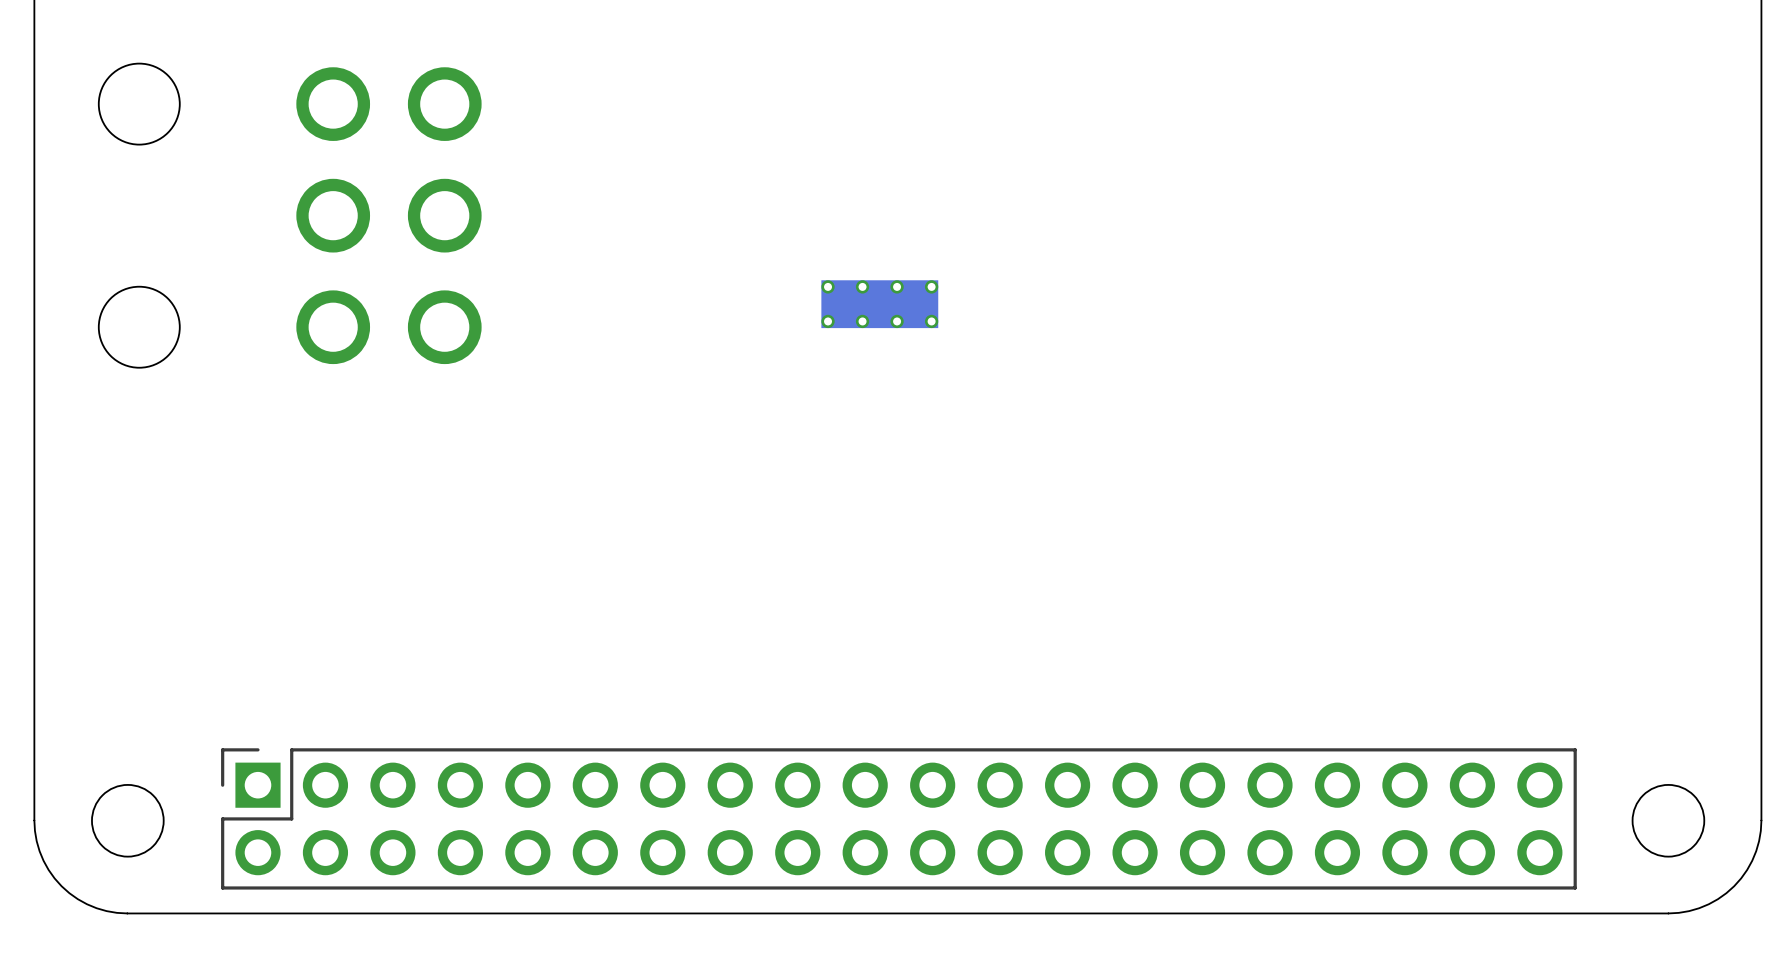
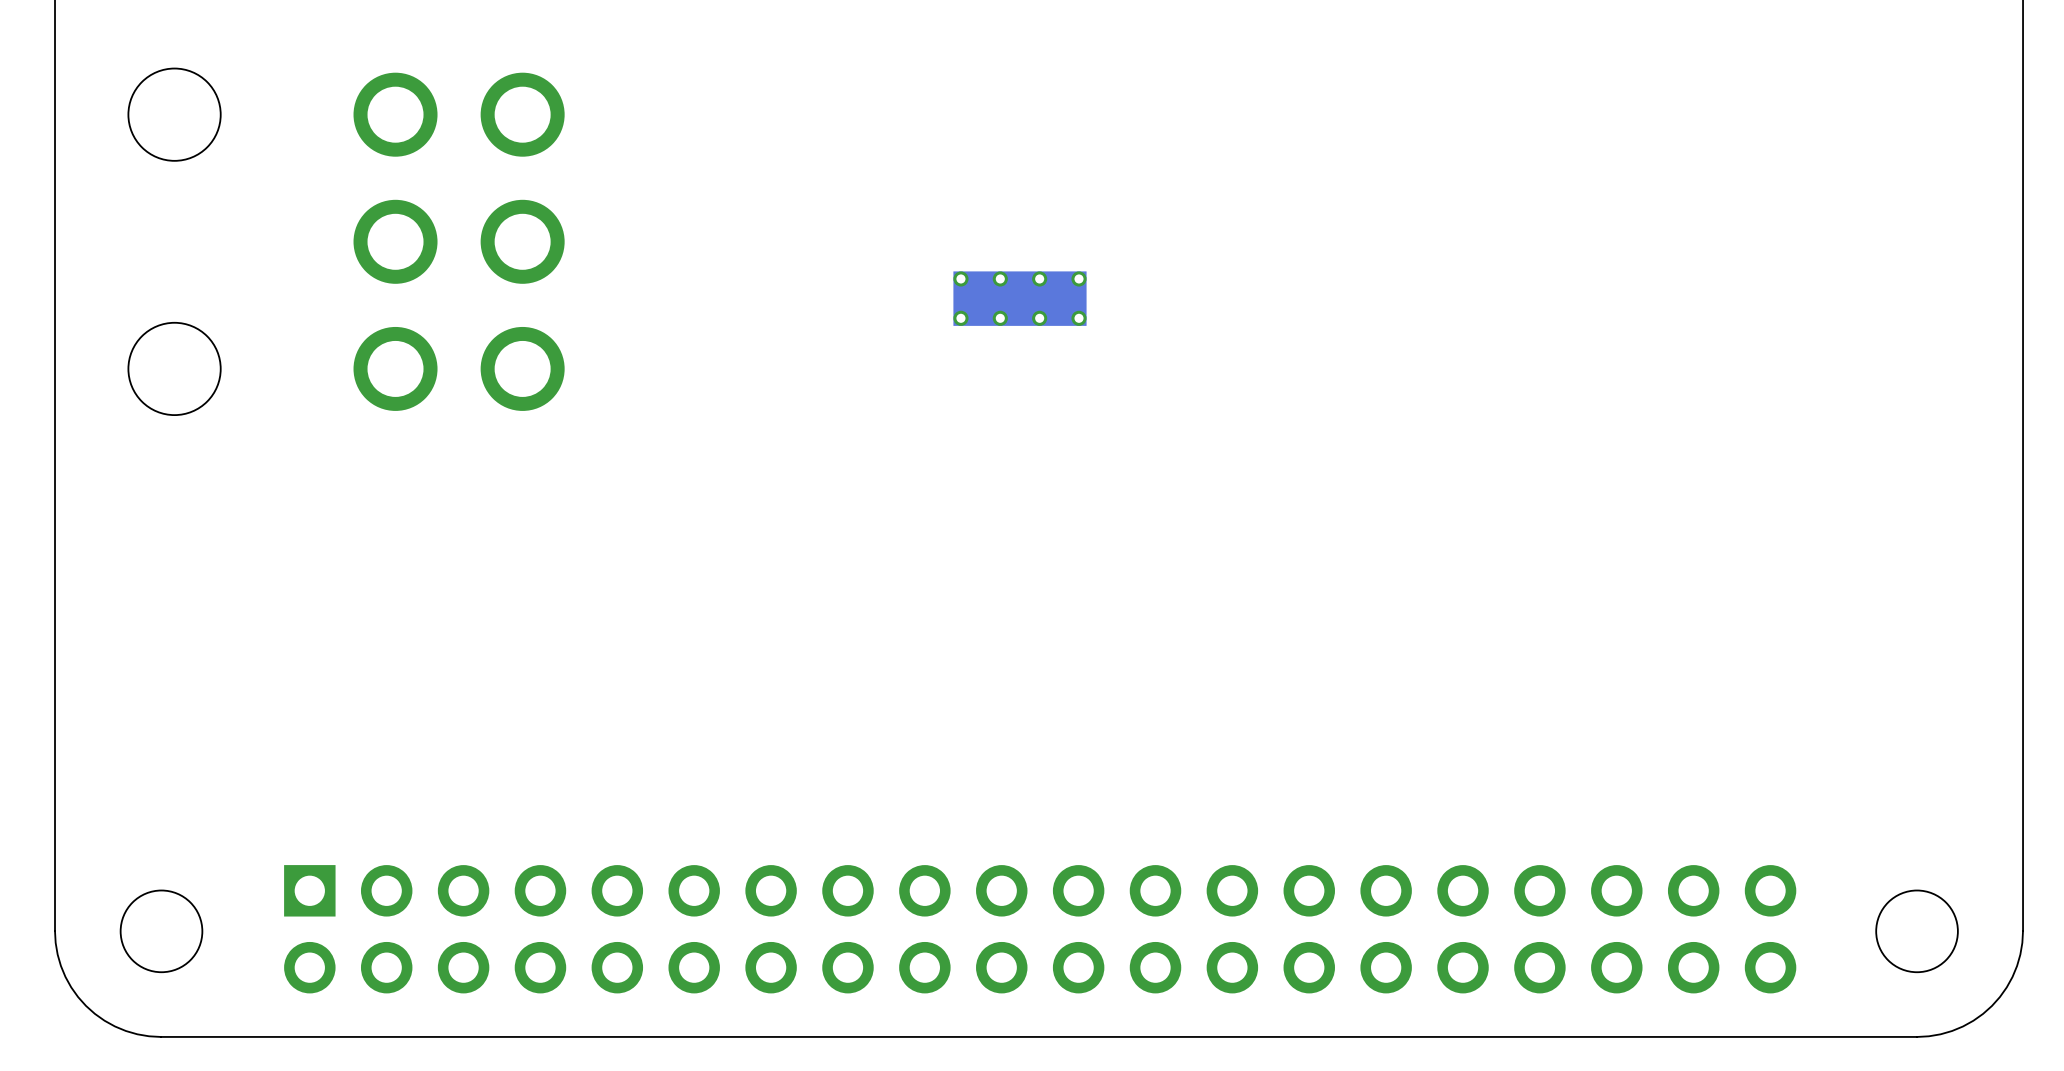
part position: (879, 304) -> (1019, 298)
part footprint: [221, 748, 1577, 890] -> [284, 865, 1797, 994]

